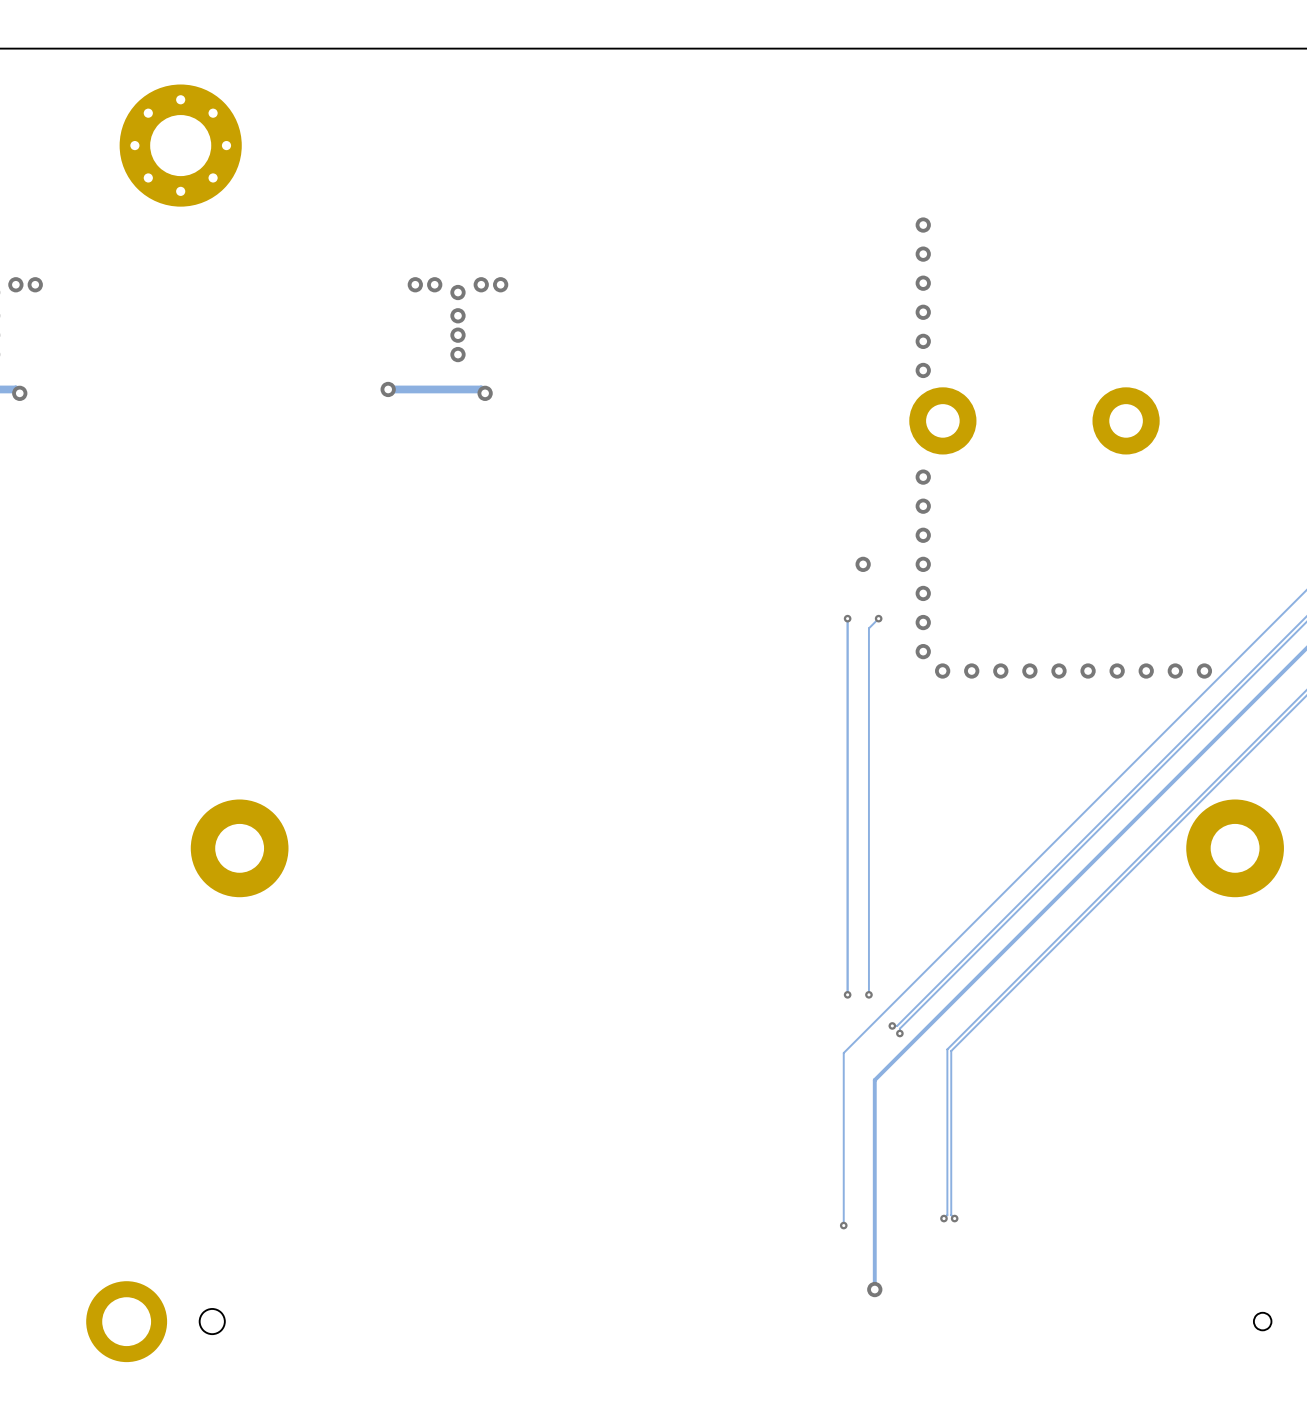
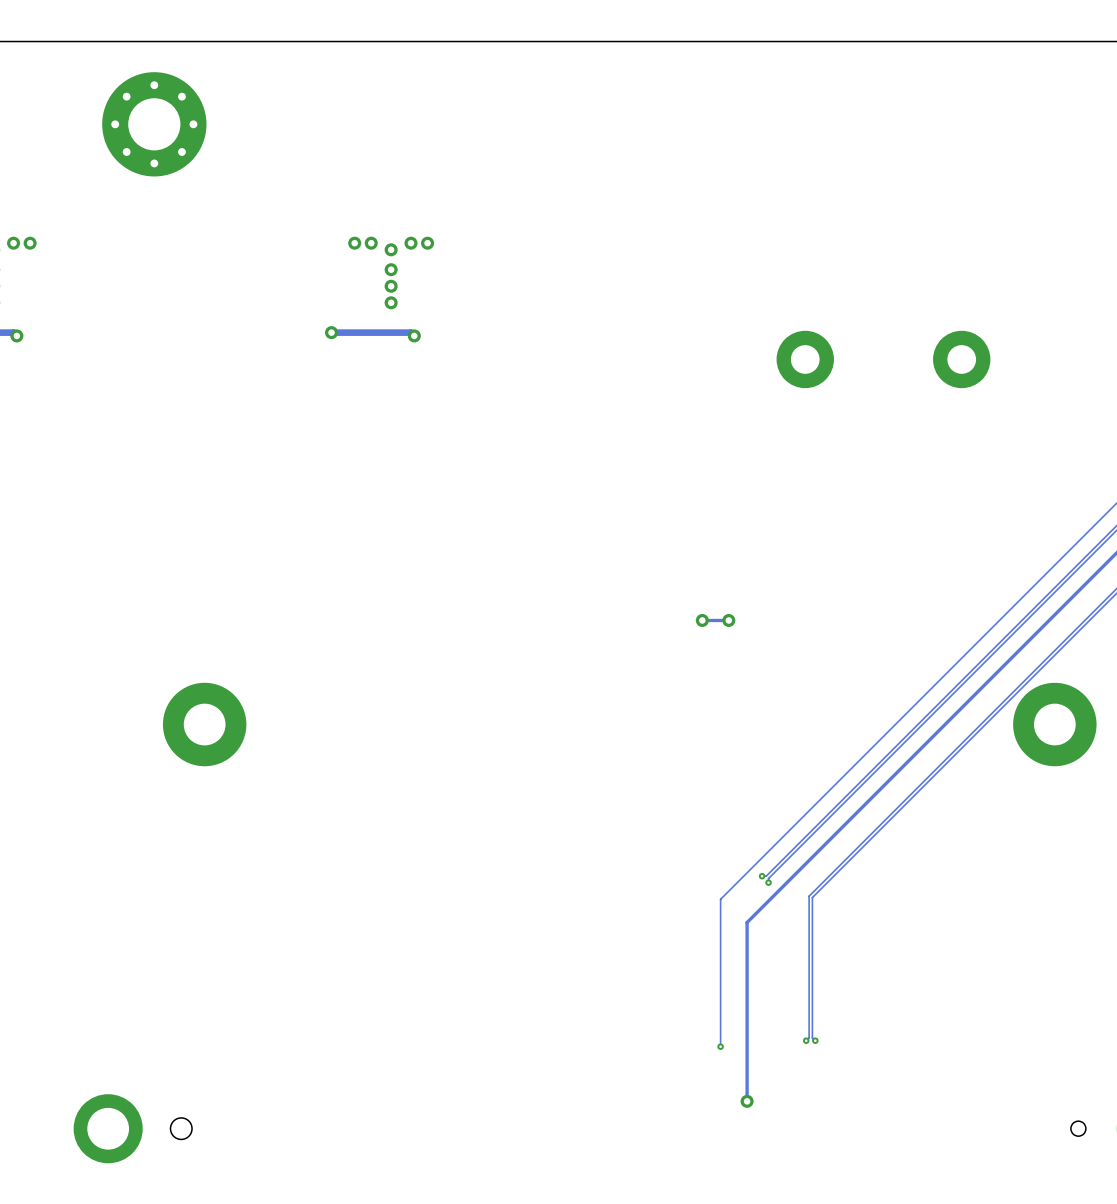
via: (923, 225) -> none
via: (923, 254) -> none
via: (923, 283) -> none
via: (923, 312) -> none
via: (923, 341) -> none
via: (923, 370) -> none
via: (923, 477) -> none
via: (923, 506) -> none
via: (923, 535) -> none
via: (863, 564) -> none
via: (923, 564) -> none
via: (923, 593) -> none
track: (847, 618) (847, 994) -> none
via: (847, 618) -> none
track: (878, 618) (868, 628) (868, 994) -> none
via: (878, 618) -> none
via: (923, 622) -> none
via: (923, 651) -> none
via: (942, 671) -> none
via: (971, 671) -> none
via: (1000, 671) -> none
via: (1029, 671) -> none
via: (1058, 671) -> none
via: (1088, 671) -> none
via: (1117, 671) -> none
via: (1146, 671) -> none
via: (1175, 671) -> none
via: (1204, 671) -> none
via: none -> (702, 620)
track: none -> (728, 620) (702, 620)
via: none -> (728, 620)
via: (847, 994) -> none
via: (868, 994) -> none

